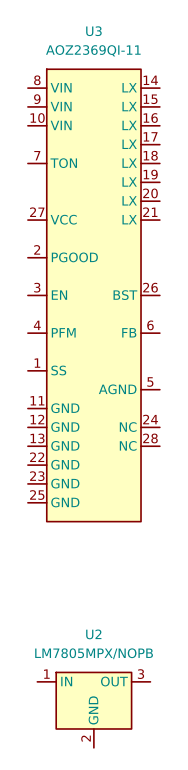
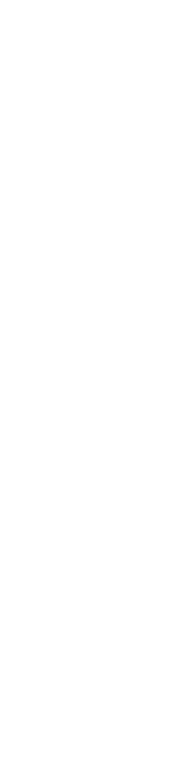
U3: AOZ2369QI-11 (93, 295) -> none
U2: LM7805MPX/NOPB (93, 710) -> none

